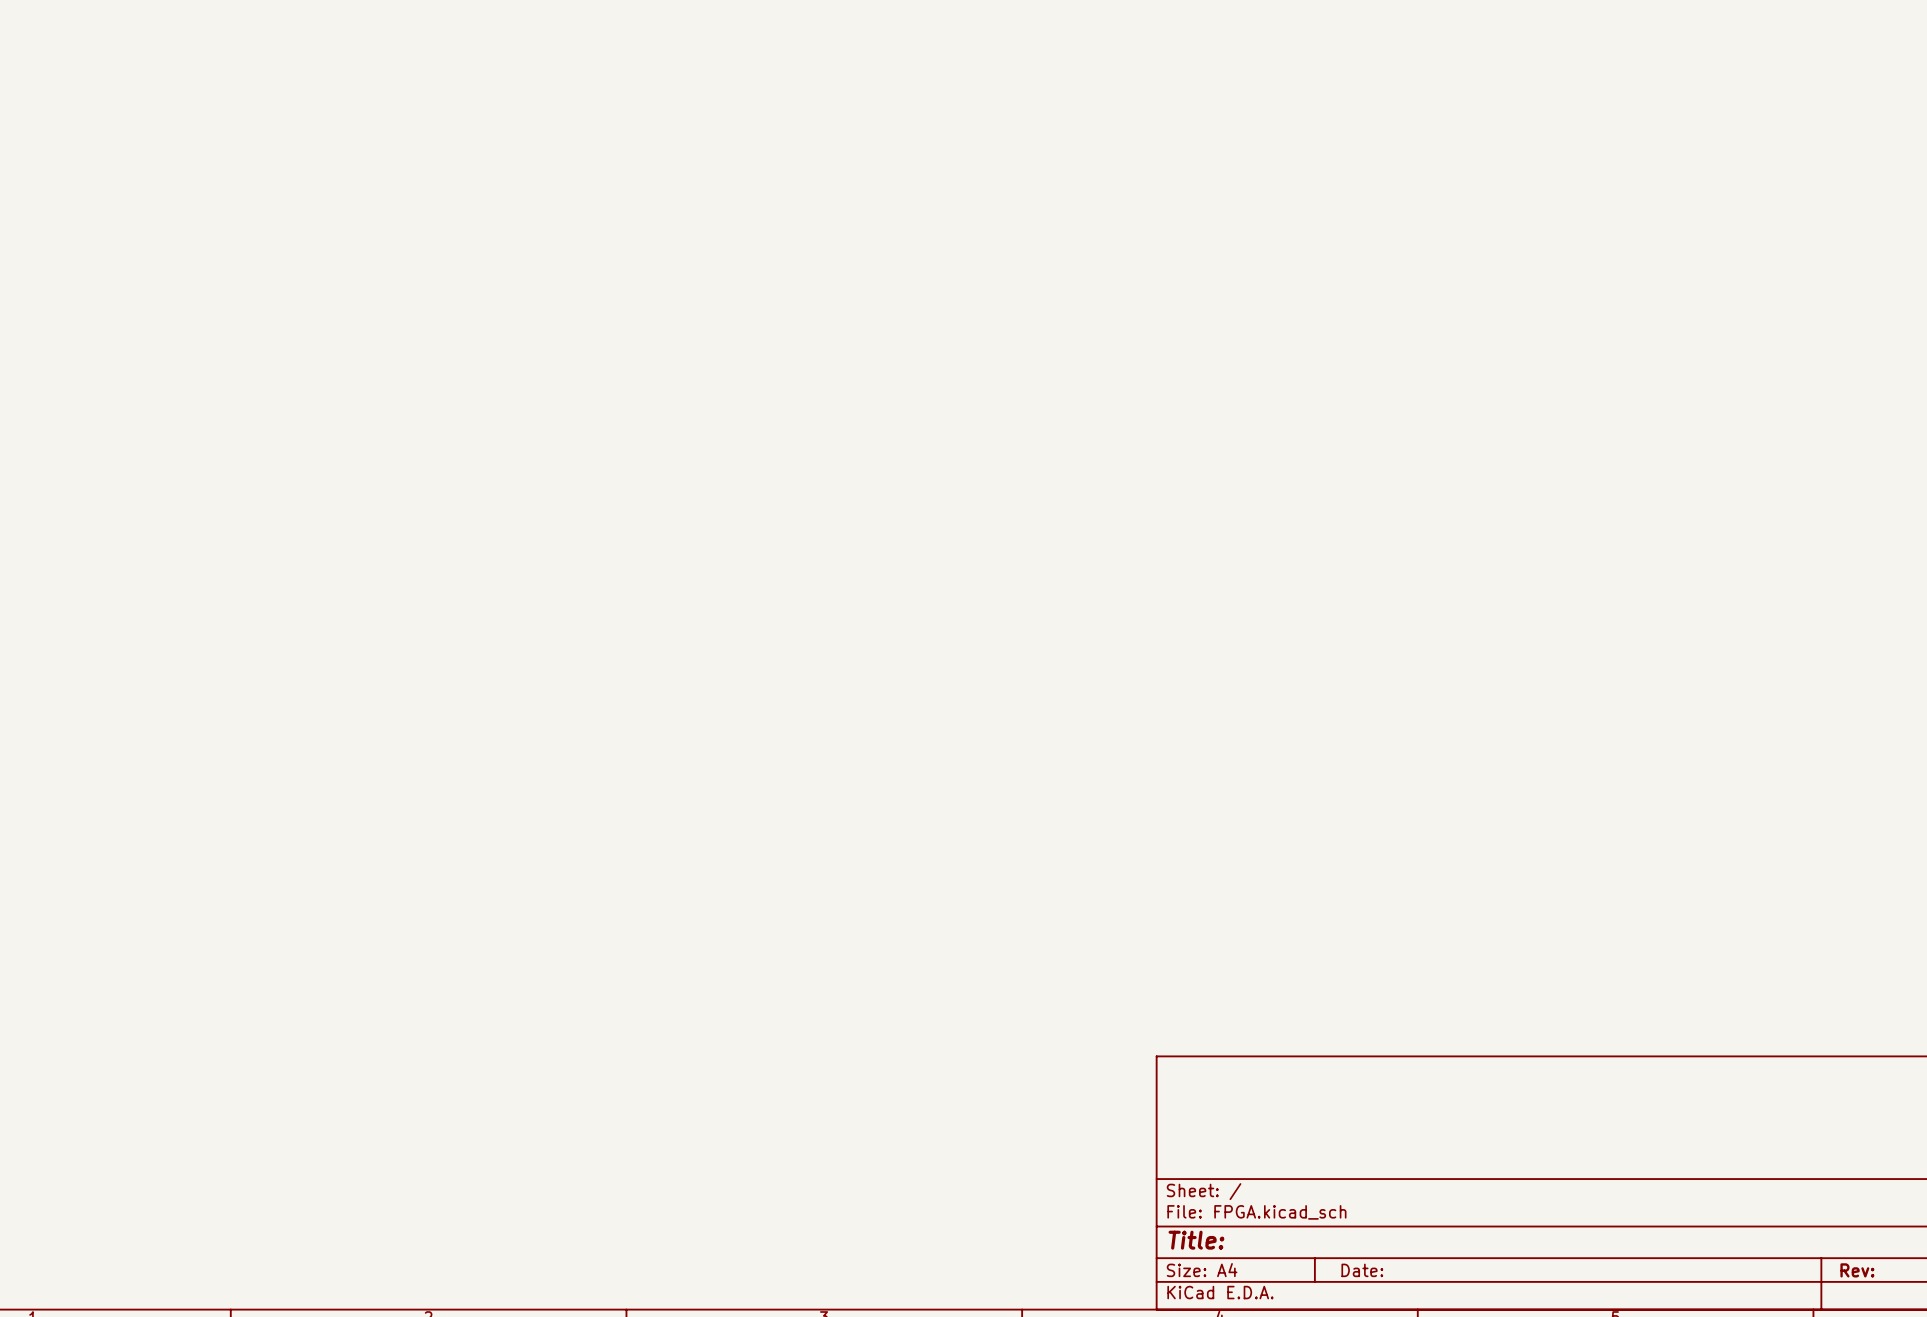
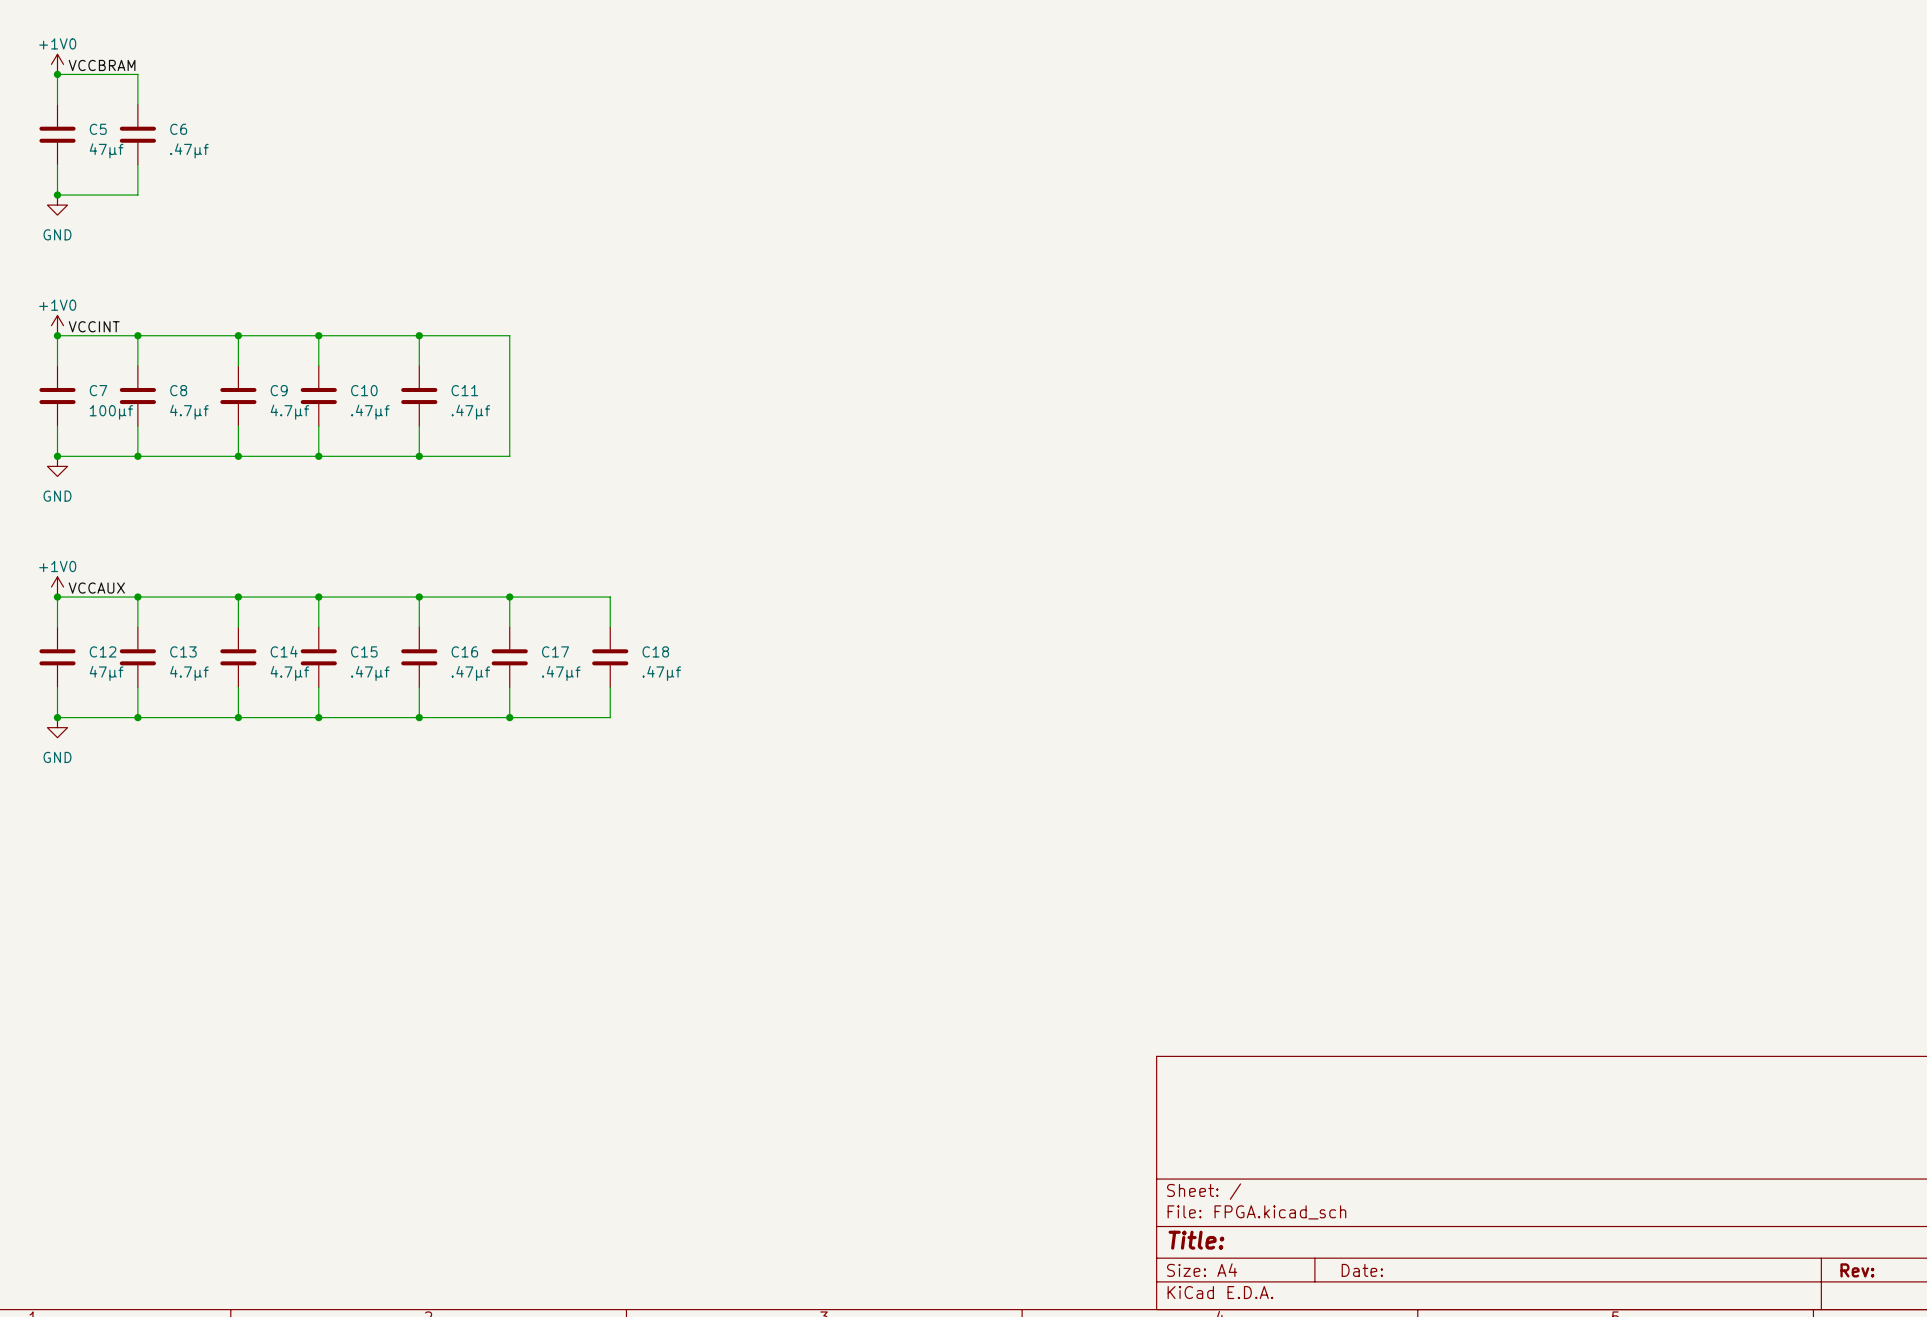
power symbol: none -> +1V0 (57, 64)
label: none -> VCCBRAM (102, 65)
junction: none -> (57, 74)
wire: none -> (57, 104) (57, 74) (137, 74) (137, 104)
C5: none -> 47µf (57, 134)
C6: none -> .47µf (137, 134)
wire: none -> (57, 164) (57, 195) (137, 195) (137, 164)
junction: none -> (57, 195)
power symbol: none -> GND (57, 205)
power symbol: none -> +1V0 (57, 325)
label: none -> VCCINT (94, 326)
junction: none -> (57, 335)
wire: none -> (137, 335) (137, 365)
junction: none -> (137, 335)
wire: none -> (238, 335) (238, 365)
junction: none -> (238, 335)
wire: none -> (318, 335) (318, 365)
junction: none -> (318, 335)
wire: none -> (419, 335) (419, 365)
junction: none -> (419, 335)
wire: none -> (57, 365) (57, 335) (509, 335) (509, 456) (57, 456) (57, 426)
C7: none -> 100µf (57, 396)
C8: none -> 4.7µf (137, 396)
C9: none -> 4.7µf (238, 396)
C10: none -> .47µf (318, 396)
C11: none -> .47µf (419, 396)
wire: none -> (137, 426) (137, 456)
wire: none -> (238, 426) (238, 456)
wire: none -> (318, 426) (318, 456)
wire: none -> (419, 426) (419, 456)
junction: none -> (57, 456)
junction: none -> (137, 456)
junction: none -> (238, 456)
junction: none -> (318, 456)
junction: none -> (419, 456)
power symbol: none -> GND (57, 466)
power symbol: none -> +1V0 (57, 586)
label: none -> VCCAUX (96, 588)
junction: none -> (57, 597)
wire: none -> (137, 597) (137, 627)
junction: none -> (137, 597)
wire: none -> (238, 597) (238, 627)
junction: none -> (238, 597)
wire: none -> (318, 597) (318, 627)
junction: none -> (318, 597)
wire: none -> (419, 597) (419, 627)
junction: none -> (419, 597)
wire: none -> (509, 597) (509, 627)
junction: none -> (509, 597)
wire: none -> (57, 627) (57, 597) (610, 597) (610, 627)
C12: none -> 47µf (57, 657)
C13: none -> 4.7µf (137, 657)
C14: none -> 4.7µf (238, 657)
C15: none -> .47µf (318, 657)
C16: none -> .47µf (419, 657)
C17: none -> .47µf (509, 657)
C18: none -> .47µf (610, 657)
wire: none -> (57, 687) (57, 717) (610, 717) (610, 687)
wire: none -> (137, 687) (137, 717)
wire: none -> (238, 687) (238, 717)
wire: none -> (318, 687) (318, 717)
wire: none -> (419, 687) (419, 717)
wire: none -> (509, 687) (509, 717)
junction: none -> (57, 717)
junction: none -> (137, 717)
junction: none -> (238, 717)
junction: none -> (318, 717)
junction: none -> (419, 717)
junction: none -> (509, 717)
power symbol: none -> GND (57, 727)

